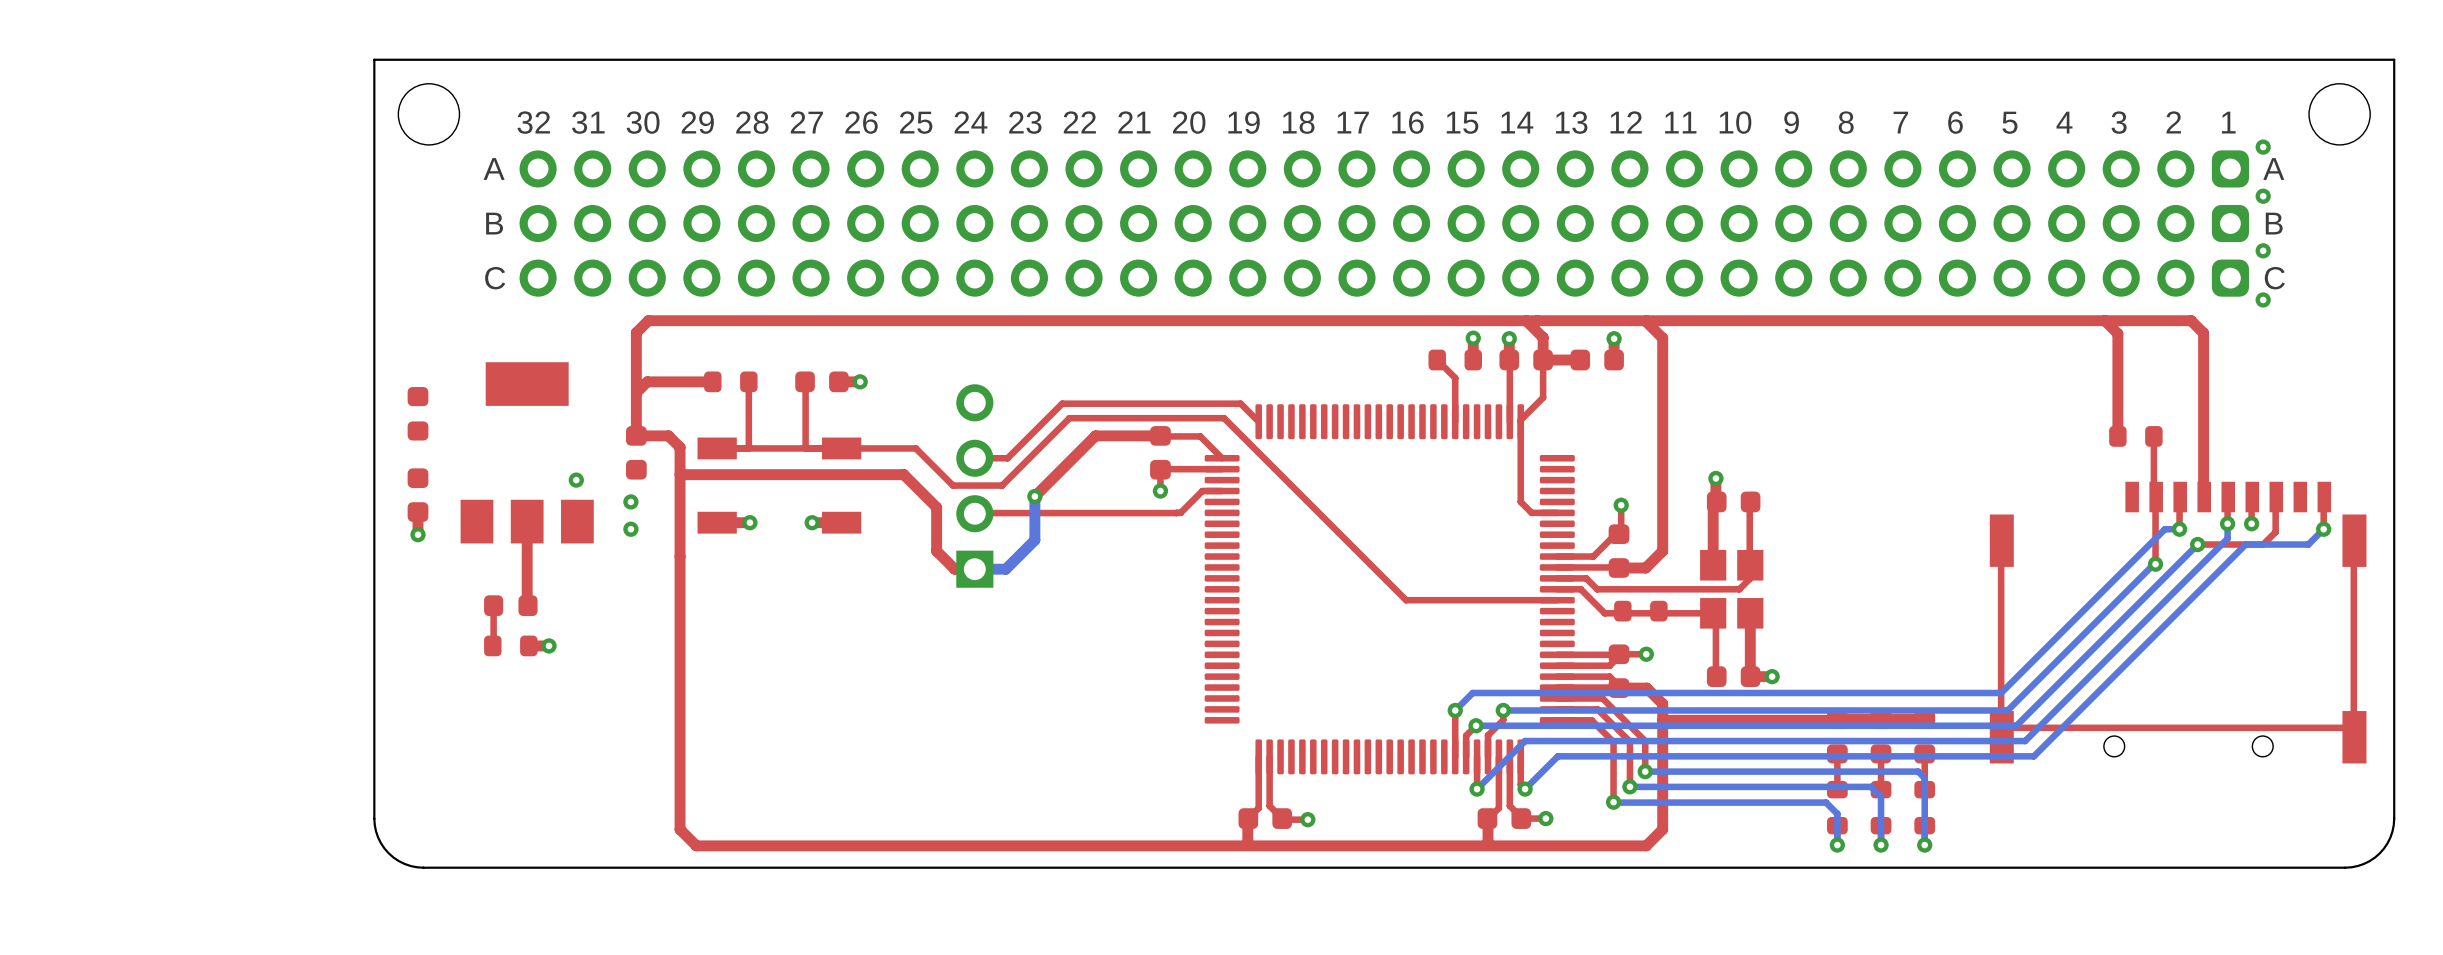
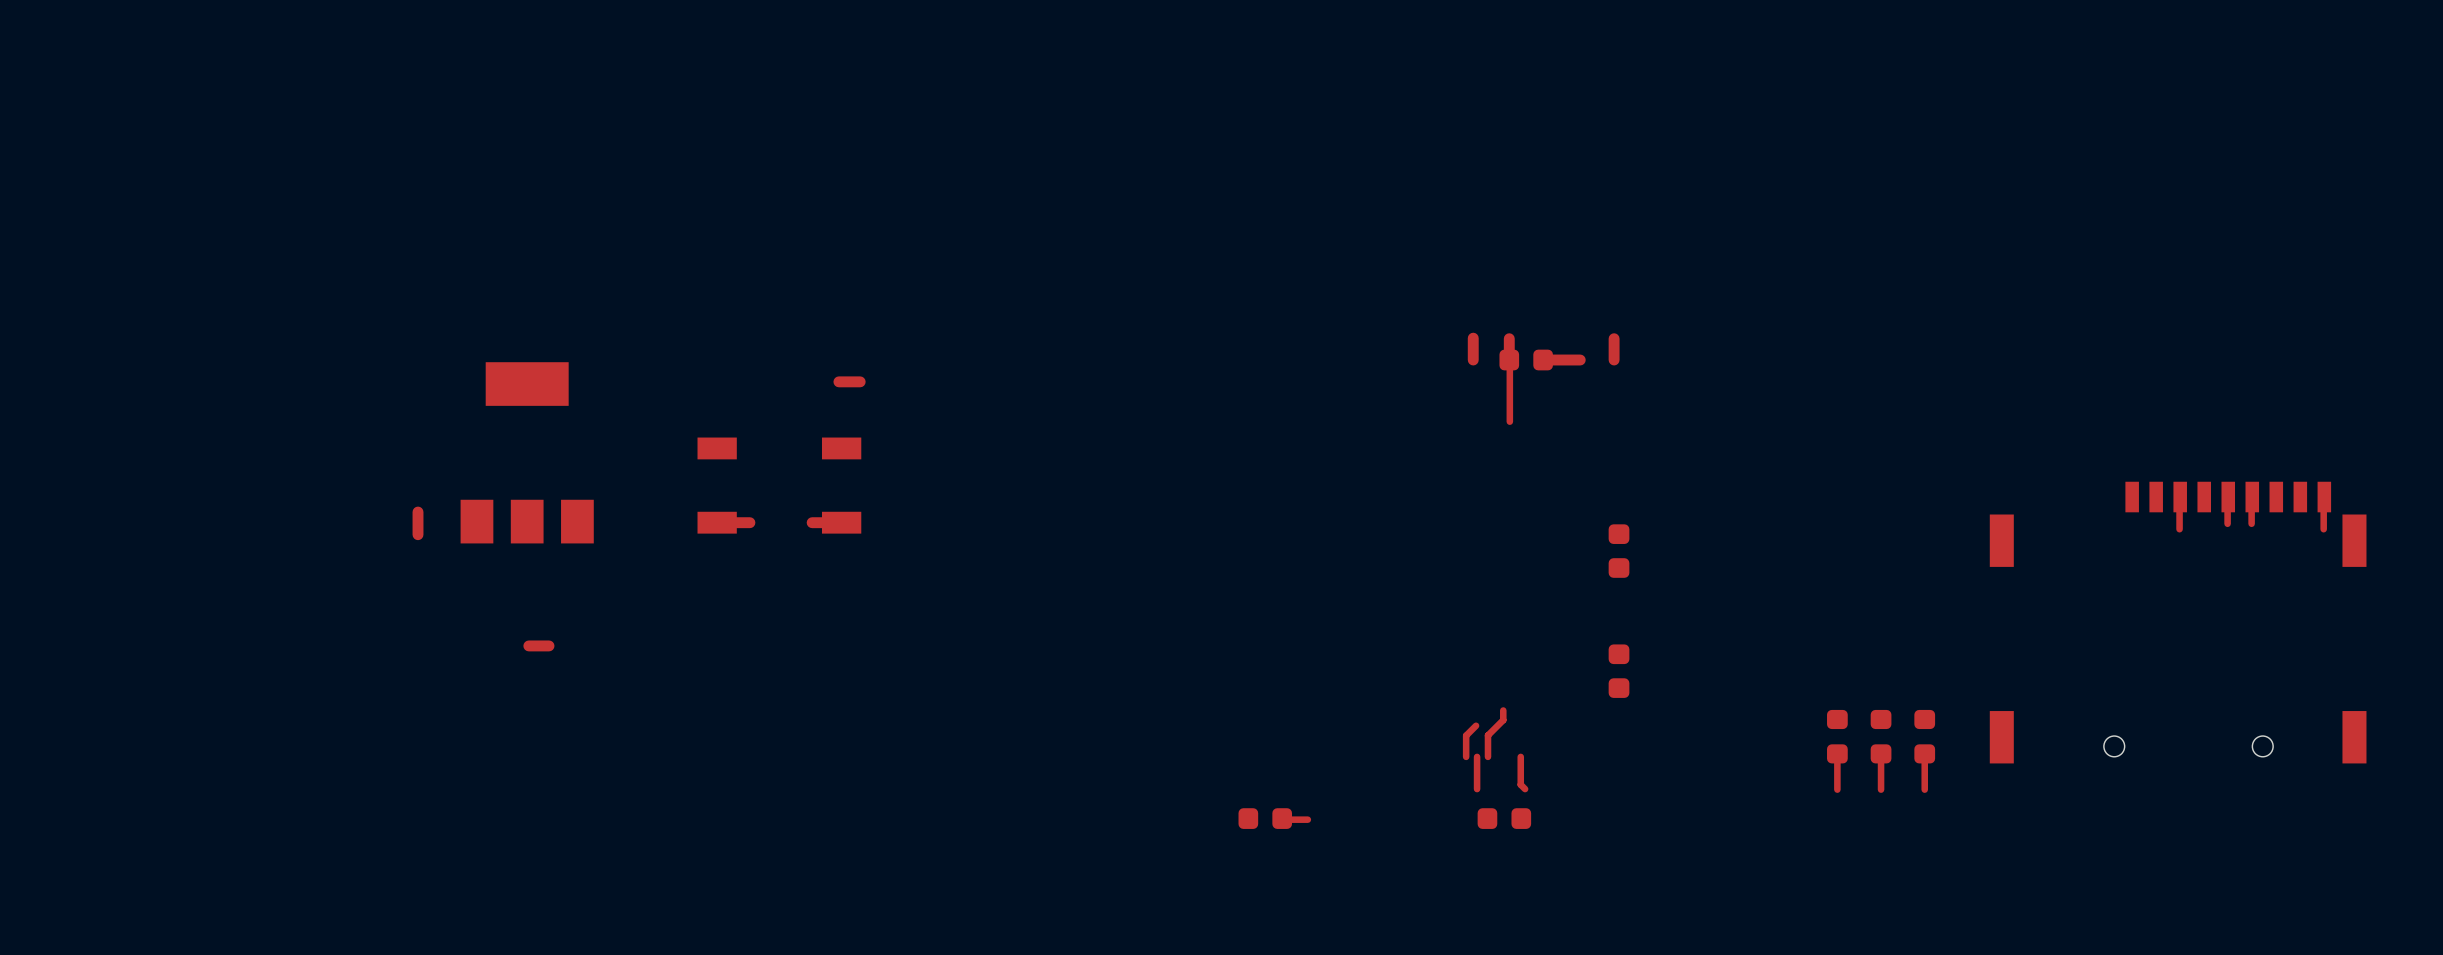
board edge: (2394, 59) (2394, 818) (2392, 831) (2387, 843) (2379, 853) (2363, 863) (2345, 867) (423, 867) (410, 866) (398, 861) (388, 853) (378, 837) (374, 818) (374, 59) (2394, 59) -> none
via: (2263, 147) -> none
part: (1384, 190) -> none
via: (2263, 196) -> none
via: (2263, 250) -> none
via: (2263, 299) -> none
top track: (1526, 320) (1543, 337) (1543, 397) (1520, 420) (1520, 501) (1531, 512) (1557, 512) -> none
top track: (1646, 320) (1662, 338) (1662, 551) (1645, 568) (1619, 568) -> none
top track: (2104, 320) (2117, 333) (2117, 436) -> none
via: (1473, 338) -> none
via: (1509, 338) -> none
via: (1614, 338) -> none
top track: (1437, 360) (1455, 378) (1455, 421) -> none
part: (1455, 360) -> none
part: (1597, 360) -> none
top track: (712, 381) (647, 381) (636, 392) -> none
part: (730, 381) -> none
top track: (748, 381) (748, 448) -> none
top track: (805, 381) (805, 448) -> none
part: (821, 381) -> none
via: (860, 381) -> none
part: (418, 413) -> none
top track: (1258, 421) (1240, 403) (1062, 403) (1007, 458) (974, 458) -> none
top track: (1160, 435) (1095, 435) (1034, 496) -> none
top track: (1160, 436) (1200, 436) (1222, 458) -> none
part: (2135, 436) -> none
top track: (2153, 436) (2155, 562) -> none
top track: (717, 448) (915, 448) (953, 485) (1002, 485) (1069, 418) (1224, 418) (1406, 600) (1557, 600) -> none
part: (636, 452) -> none
part: (1160, 452) -> none
top track: (1222, 469) (1160, 469) (1160, 491) -> none
top track: (680, 474) (903, 474) (936, 507) (936, 551) (954, 569) (974, 569) -> none
top track: (1715, 478) (1715, 501) (1713, 504) (1713, 565) -> none
via: (1715, 478) -> none
via: (576, 480) -> none
part: (974, 486) -> none
via: (1160, 491) -> none
top track: (1222, 491) (1202, 491) (1180, 512) (1176, 512) -> none
part: (418, 495) -> none
bottom track: (1034, 496) (1034, 540) (1005, 569) (974, 569) -> none
via: (1034, 496) -> none
top track: (2203, 496) (2203, 333) (2191, 320) (648, 320) (636, 332) (636, 435) (668, 435) (680, 447) (680, 829) (696, 845) (1646, 845) (1662, 829) (1662, 703) (1646, 688) (1621, 688) (1609, 676) (1557, 676) -> none
top track: (2275, 496) (2275, 532) (2263, 544) (2197, 544) -> none
via: (630, 501) -> none
part: (1733, 501) -> none
top track: (1749, 501) (1749, 578) (1739, 589) (1597, 589) (1586, 578) (1557, 578) -> none
top track: (1621, 505) (1621, 528) (1593, 556) (1557, 556) -> none
via: (1621, 505) -> none
top track: (1176, 513) (975, 513) -> none
top track: (527, 521) (528, 605) -> none
via: (749, 522) -> none
via: (812, 522) -> none
bottom track: (2227, 523) (2227, 538) (2025, 741) (1525, 741) (1477, 789) -> none
via: (2227, 523) -> none
via: (2251, 523) -> none
via: (630, 529) -> none
bottom track: (2177, 529) (2164, 529) (2001, 693) (1472, 693) (1455, 710) -> none
via: (2179, 529) -> none
bottom track: (2323, 529) (2308, 544) (2245, 544) (2033, 756) (1557, 756) (1525, 789) -> none
via: (2323, 529) -> none
via: (418, 534) -> none
top track: (2353, 540) (2353, 736) (2345, 727) (2011, 727) (2001, 737) (2001, 540) -> none
bottom track: (2197, 544) (2016, 725) (1476, 725) -> none
via: (2197, 544) -> none
bottom track: (2154, 564) (2007, 710) (1503, 710) -> none
via: (2155, 564) -> none
top track: (1616, 567) (1557, 567) -> none
part: (1389, 589) -> none
top track: (1557, 589) (1580, 589) (1604, 613) (1701, 613) -> none
part: (1731, 589) -> none
top track: (493, 605) (493, 645) -> none
part: (510, 605) -> none
part: (1640, 611) -> none
top track: (1750, 613) (1749, 676) (1772, 676) -> none
top track: (1713, 615) (1713, 613) (1715, 616) (1715, 676) -> none
part: (510, 645) -> none
via: (549, 645) -> none
top track: (1620, 654) (1557, 654) -> none
top track: (1646, 654) (1621, 654) (1609, 665) (1557, 665) -> none
via: (1646, 654) -> none
part: (1733, 676) -> none
via: (1772, 676) -> none
top track: (1620, 687) (1557, 687) -> none
top track: (1557, 698) (1602, 698) (1645, 741) (1645, 771) -> none
top track: (1557, 709) (1597, 709) (1629, 741) (1629, 786) -> none
top track: (1455, 710) (1455, 756) -> none
via: (1455, 710) -> none
via: (1503, 710) -> none
top track: (1924, 719) (1662, 720) -> none
top track: (1557, 720) (1591, 720) (1613, 742) (1613, 802) -> none
via: (1476, 725) -> none
top track: (1258, 756) (1258, 808) (1247, 819) (1247, 840) -> none
top track: (1269, 756) (1269, 806) (1282, 818) -> none
top track: (1498, 756) (1498, 808) (1488, 818) -> none
top track: (1509, 756) (1509, 806) (1522, 818) (1545, 818) -> none
bottom track: (1645, 771) (1918, 771) (1924, 778) (1924, 845) -> none
via: (1645, 771) -> none
via: (1629, 786) -> none
bottom track: (1630, 786) (1871, 786) (1881, 796) (1881, 845) -> none
via: (1477, 789) -> none
via: (1525, 789) -> none
bottom track: (1613, 802) (1826, 802) (1837, 813) (1837, 845) -> none
via: (1613, 802) -> none
part: (1837, 807) -> none
part: (1881, 807) -> none
part: (1924, 807) -> none
via: (1545, 818) -> none
via: (1307, 819) -> none
top track: (1487, 819) (1487, 840) -> none
via: (1837, 845) -> none
via: (1881, 845) -> none
via: (1924, 845) -> none

